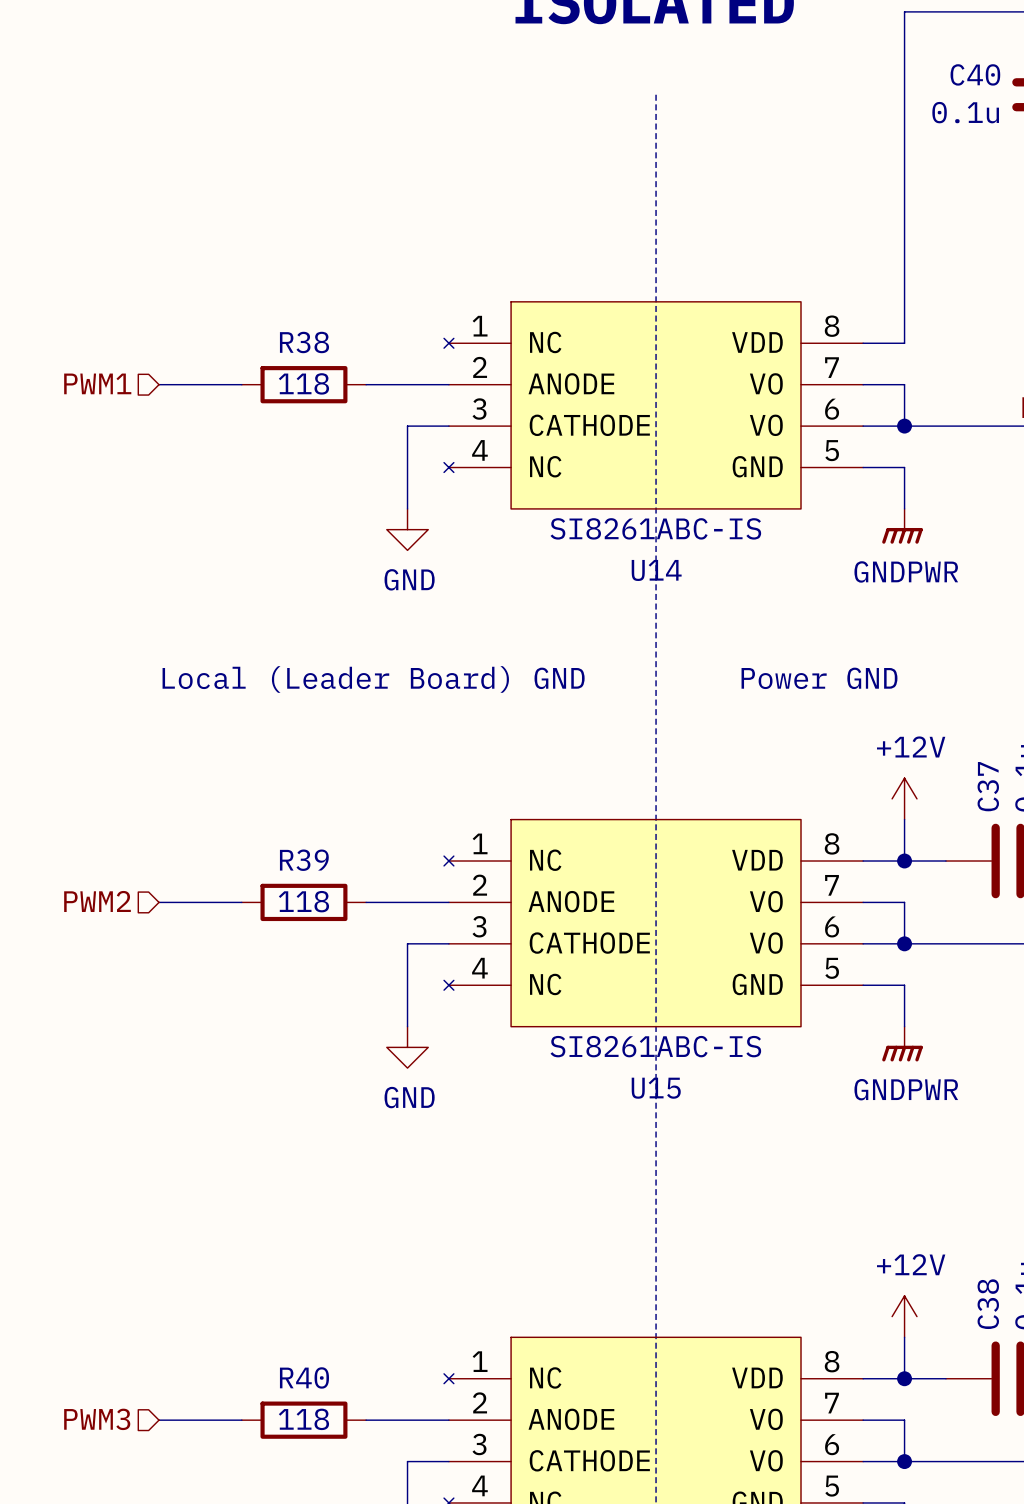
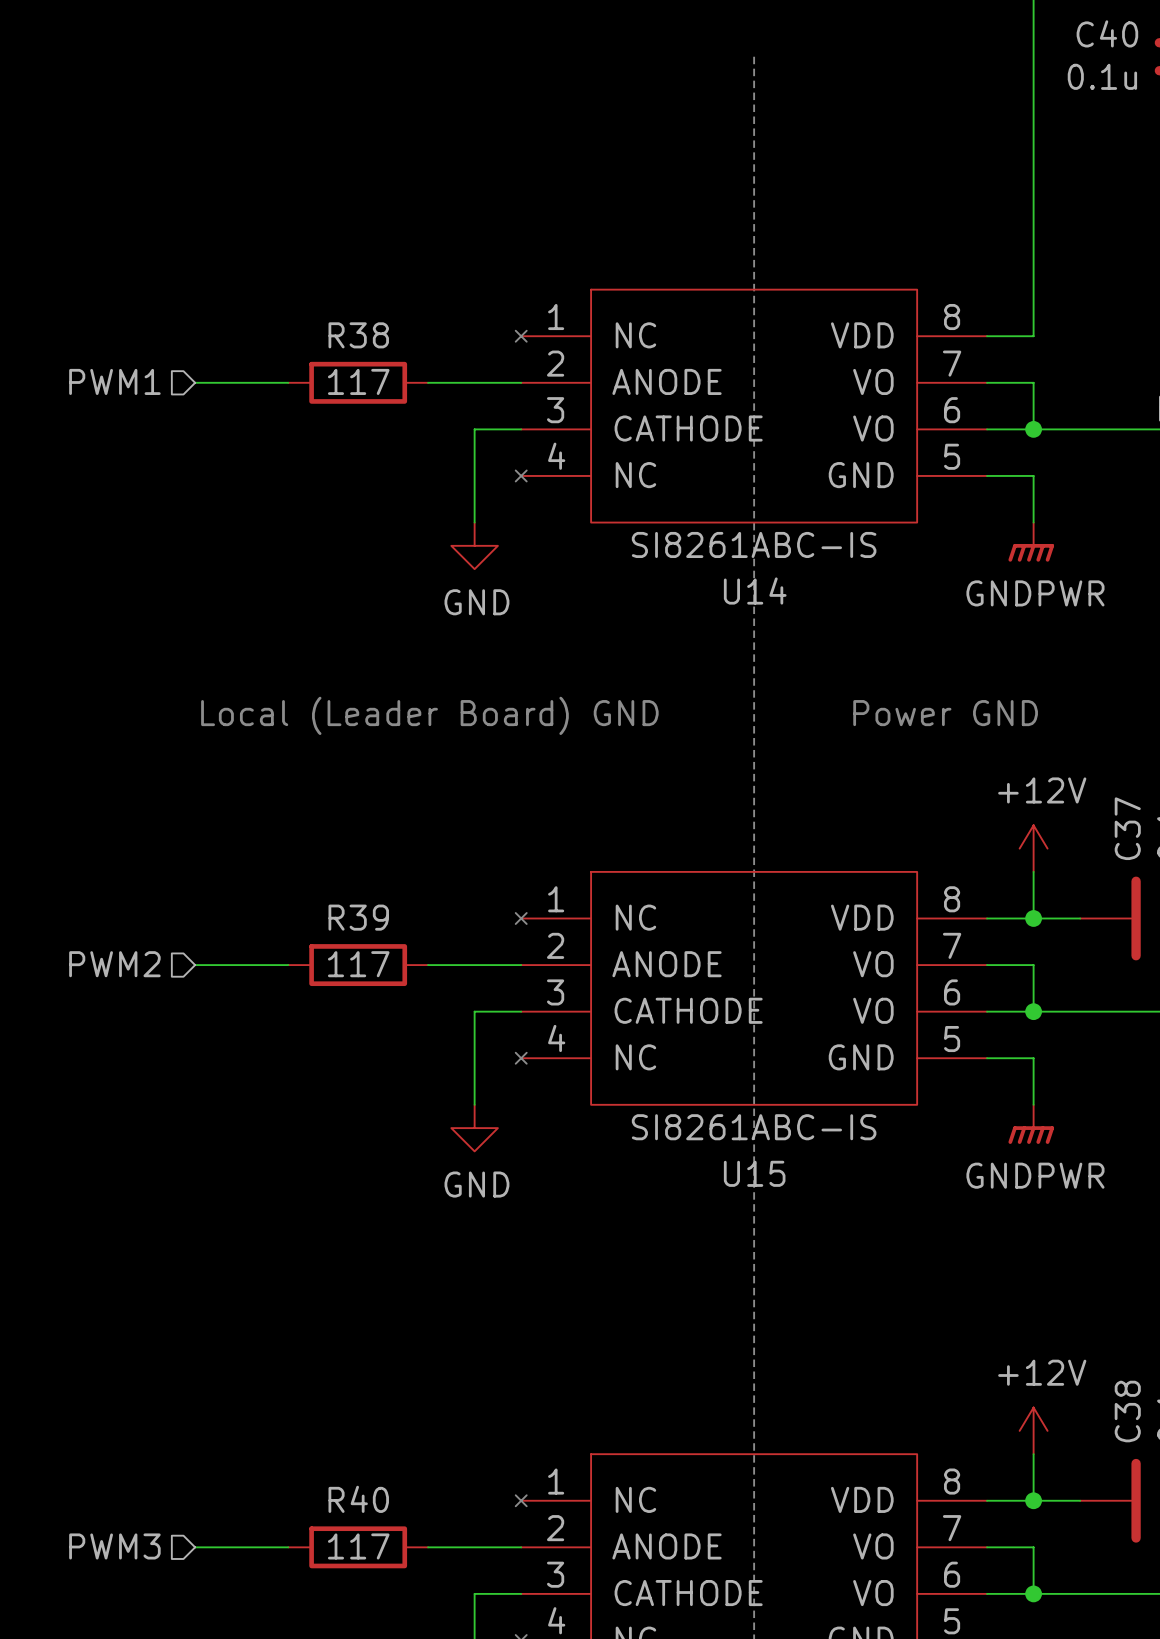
R38 value: 118 (303, 383) -> 117 (358, 381)
R39 value: 118 (303, 901) -> 117 (358, 964)
R40 value: 118 (303, 1419) -> 117 (358, 1546)

